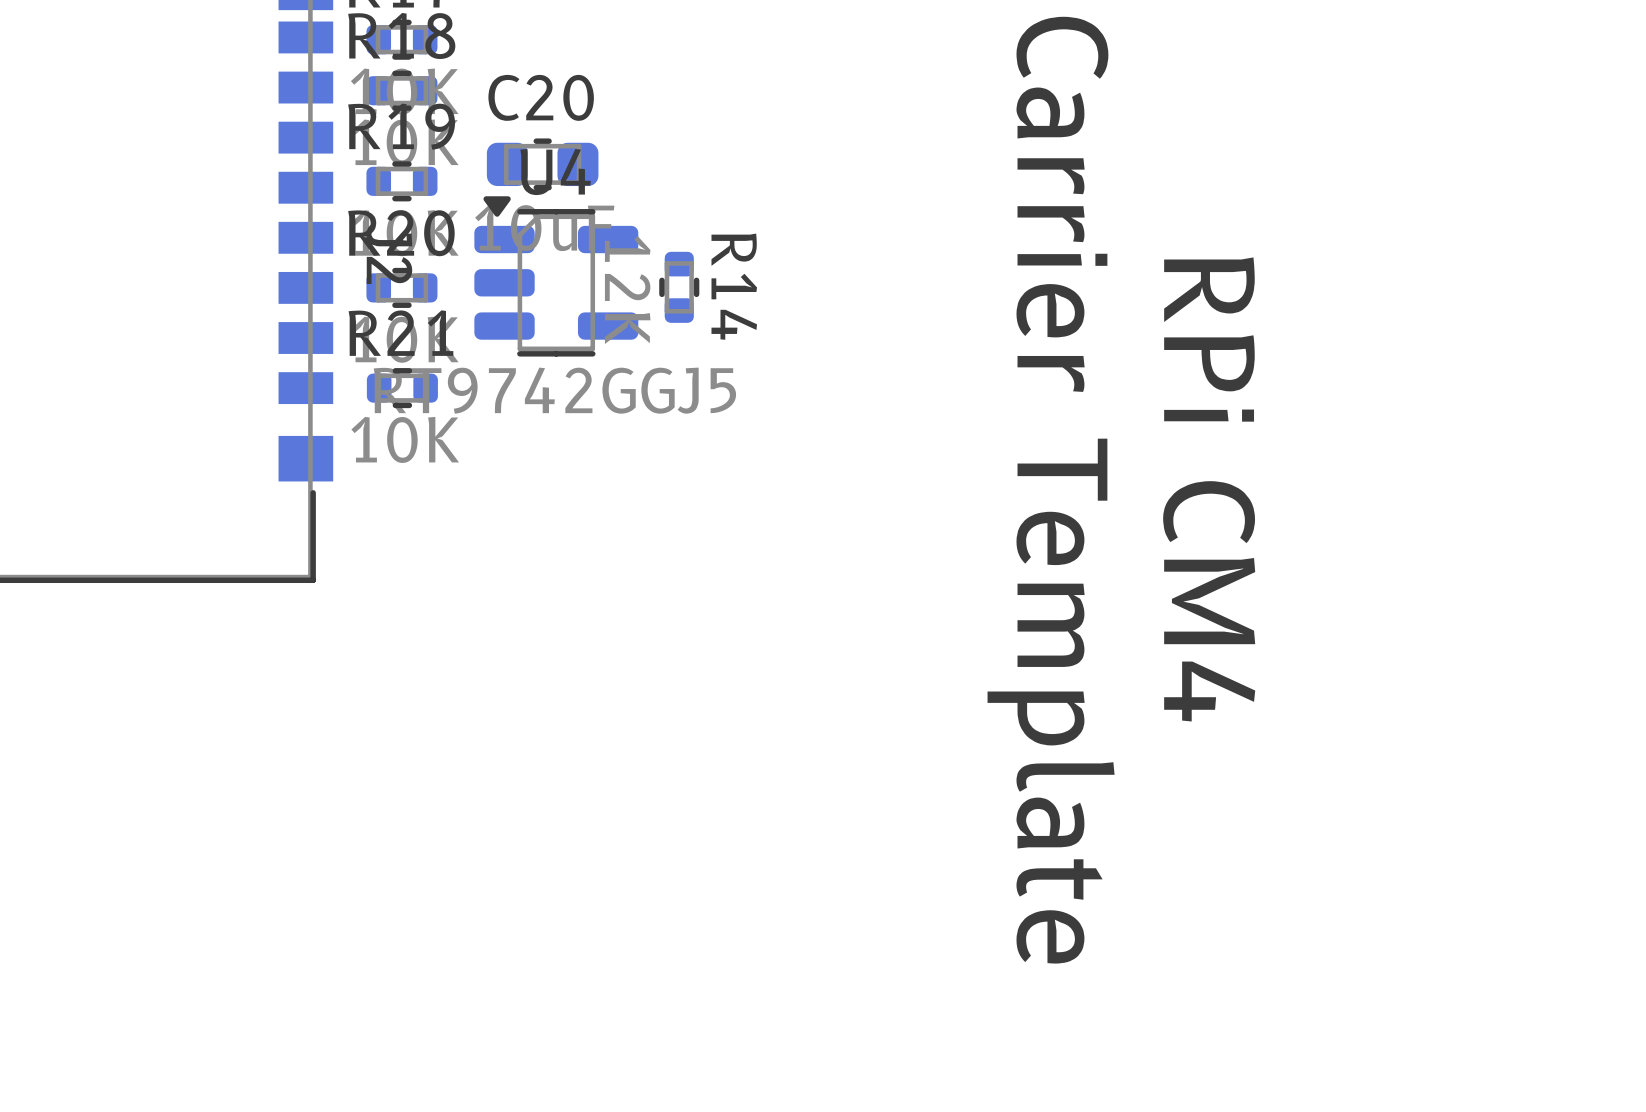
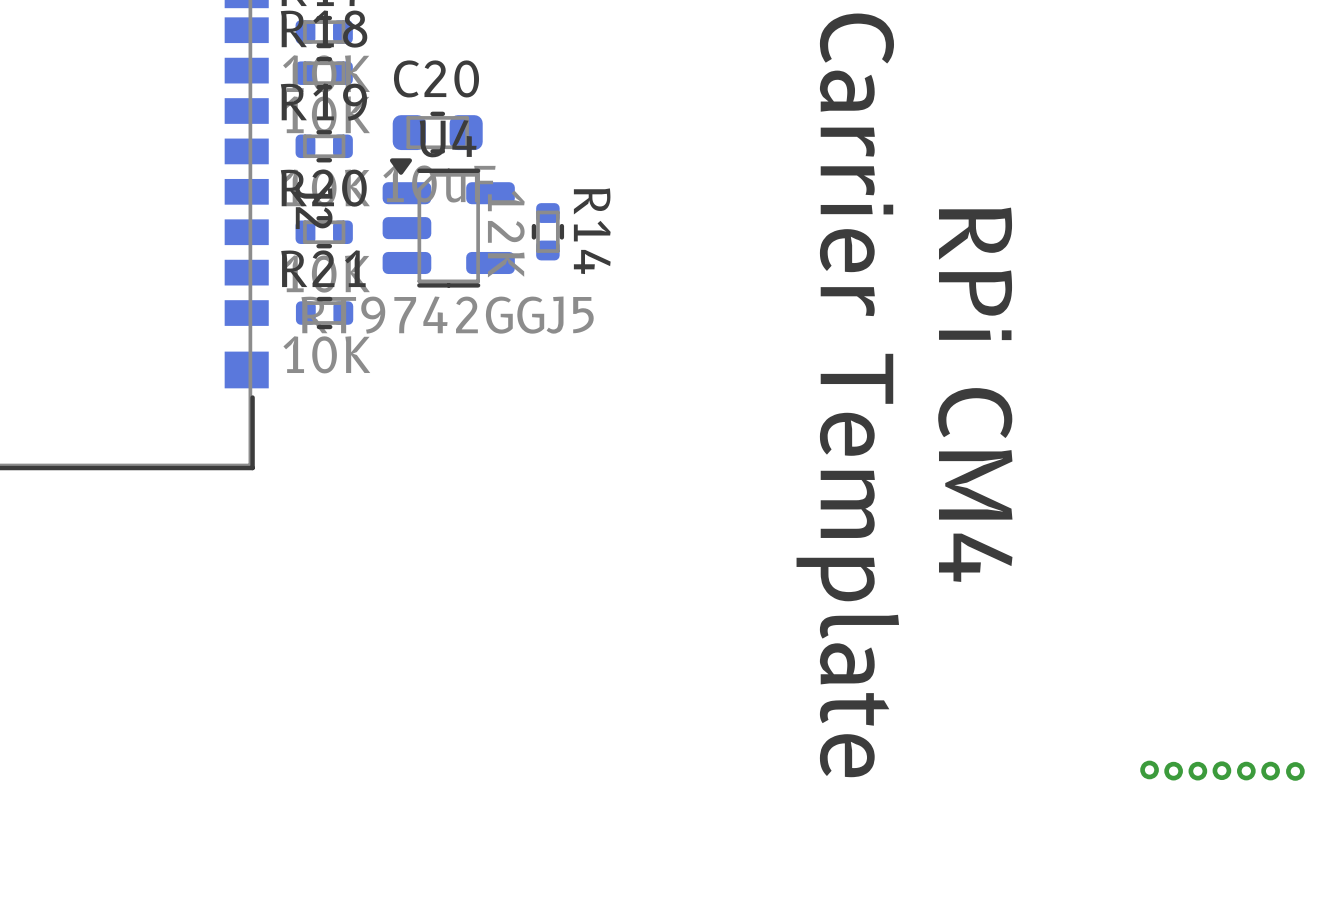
via: none -> (1149, 769)
via: none -> (1221, 770)
via: none -> (1246, 771)
via: none -> (1270, 771)
via: none -> (1173, 771)
via: none -> (1197, 771)
via: none -> (1295, 771)

